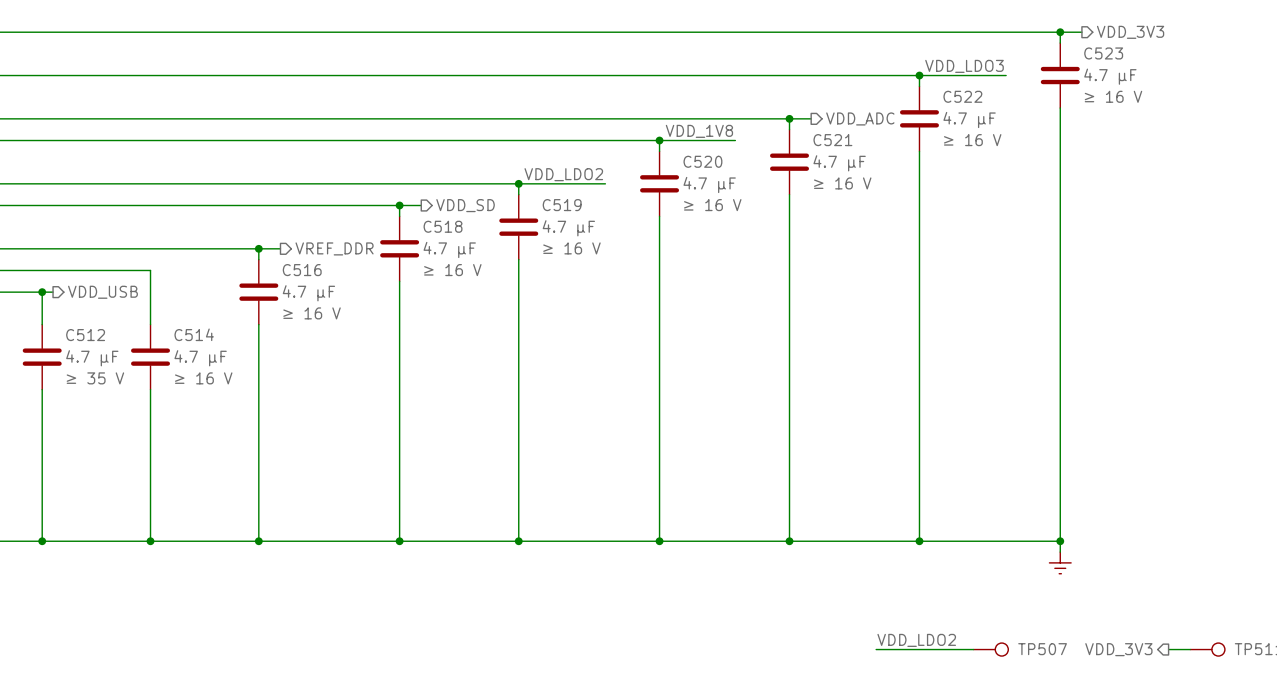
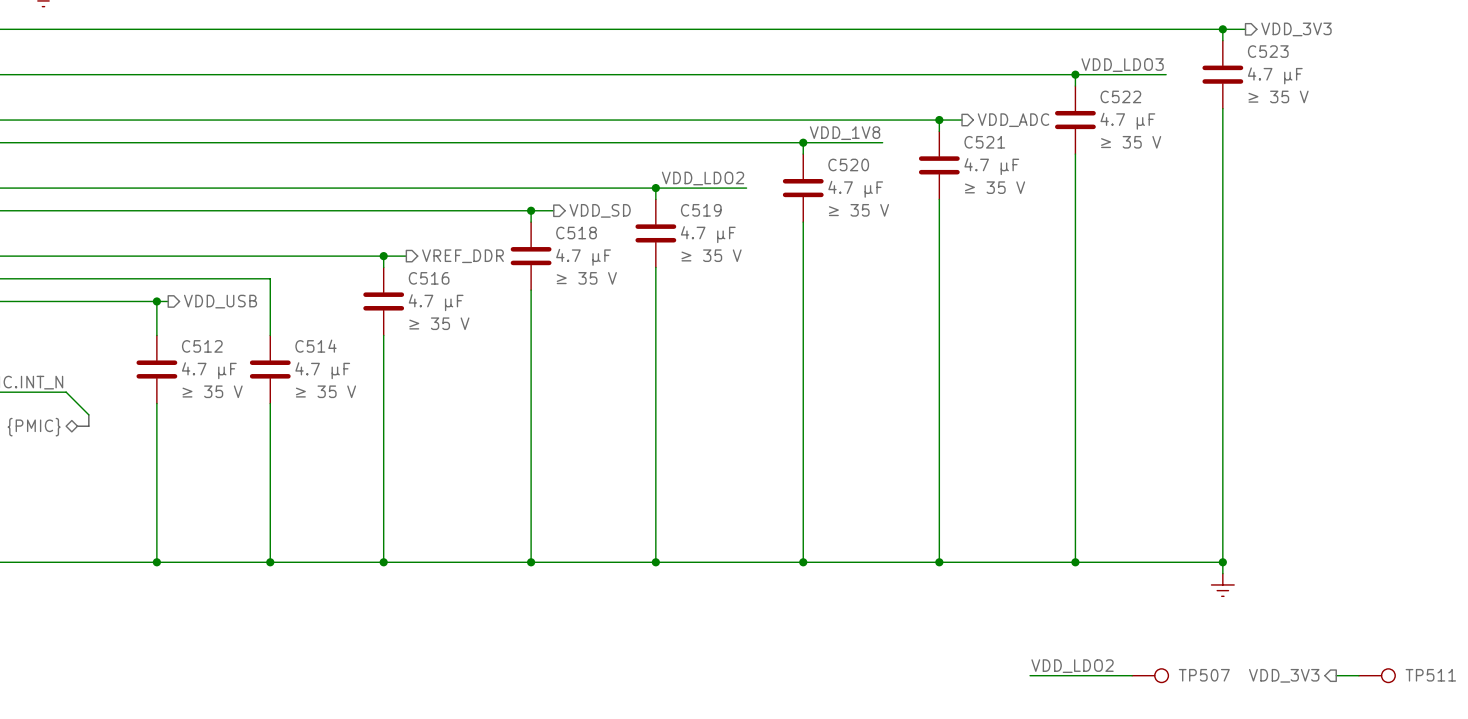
C523 text: ≥ 16 V (1113, 96) -> ≥ 35 V (1278, 96)
C522 text: ≥ 16 V (972, 140) -> ≥ 35 V (1131, 142)
C521 text: ≥ 16 V (842, 183) -> ≥ 35 V (995, 187)
C520 text: ≥ 16 V (712, 205) -> ≥ 35 V (858, 210)
C519 text: ≥ 16 V (571, 248) -> ≥ 35 V (711, 255)
C518 text: ≥ 16 V (452, 270) -> ≥ 35 V (586, 278)
C516 text: ≥ 16 V (312, 313) -> ≥ 35 V (439, 323)
C514 text: ≥ 16 V (203, 378) -> ≥ 35 V (325, 391)

